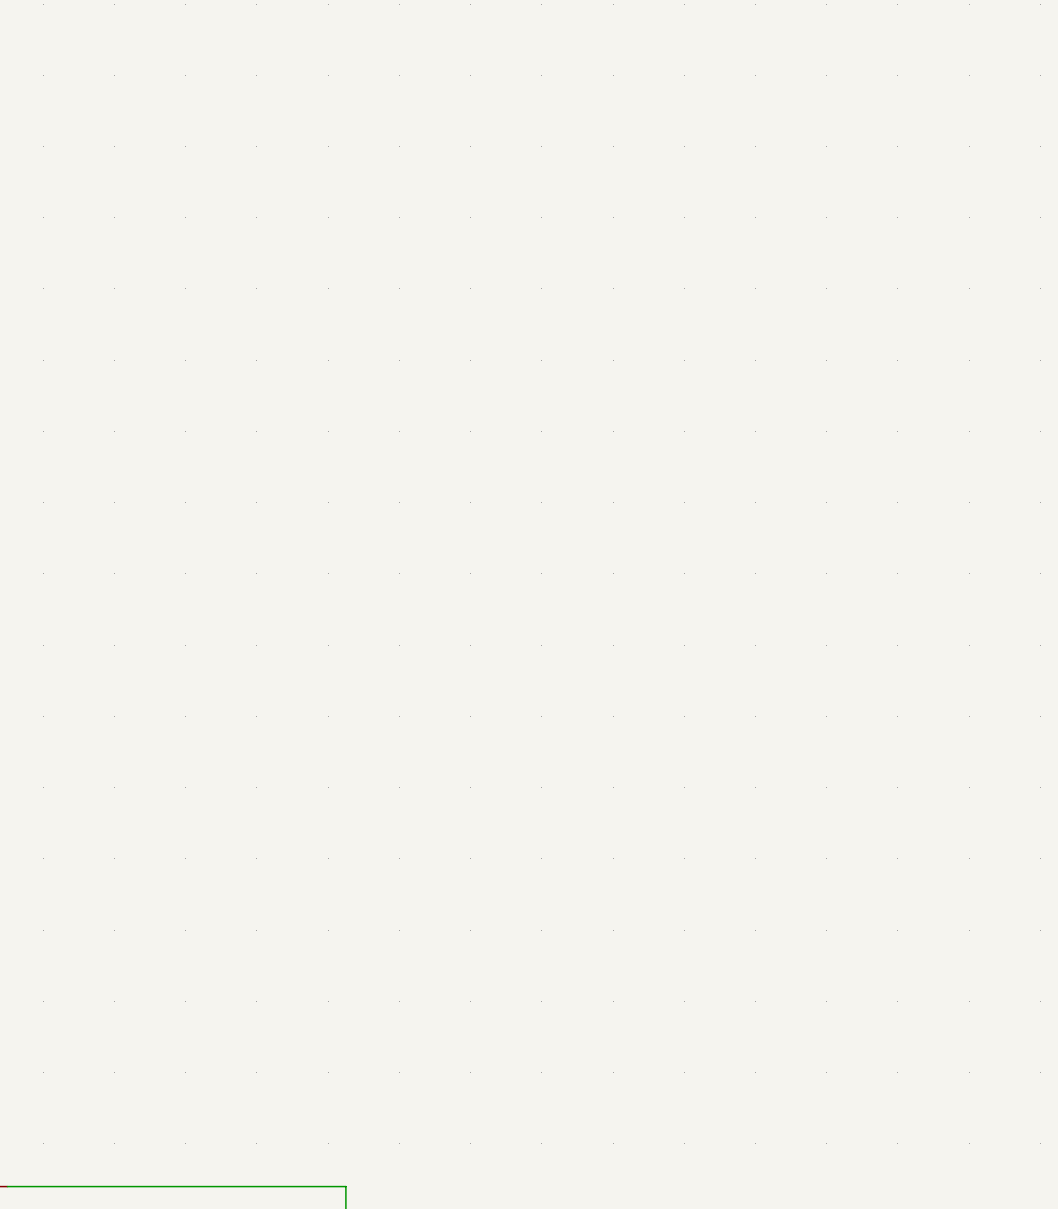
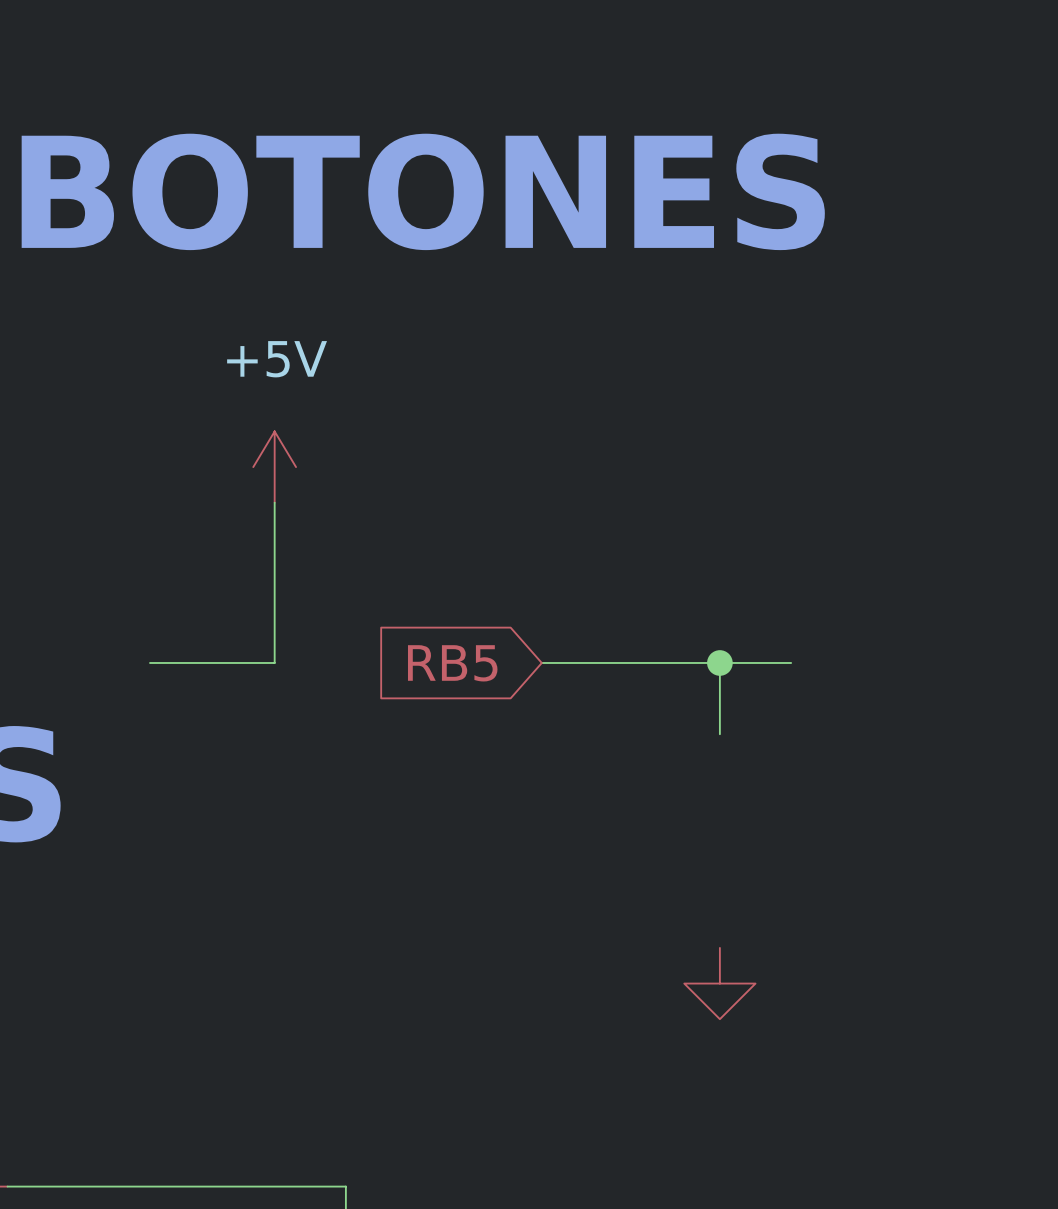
text: none -> BOTONES (423, 191)
power symbol: none -> +5V (274, 467)
wire: none -> (274, 502) (274, 662) (150, 662)
global label: none -> RB5 (452, 663)
wire: none -> (541, 662) (791, 662)
wire: none -> (719, 662) (719, 734)
junction: none -> (719, 662)
power symbol: none -> (719, 983)

